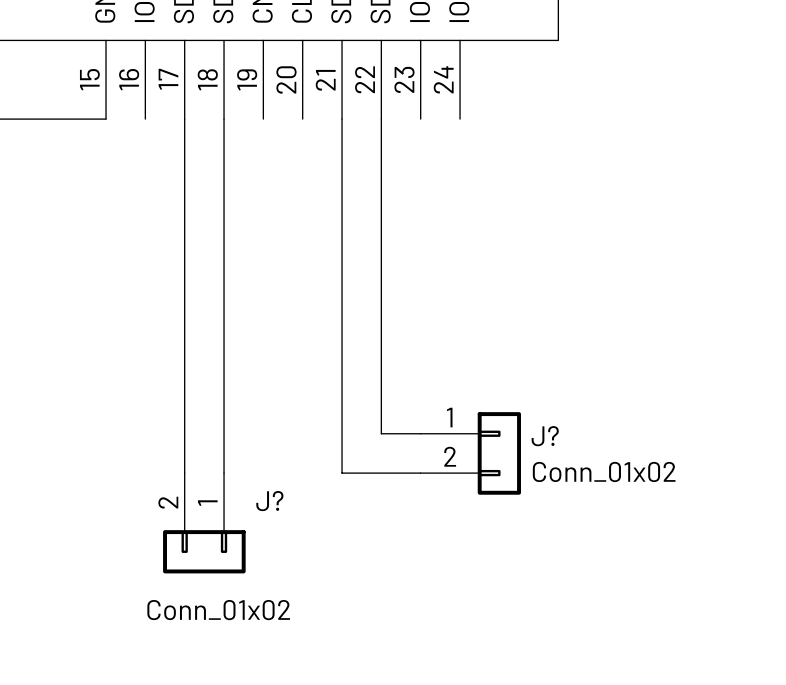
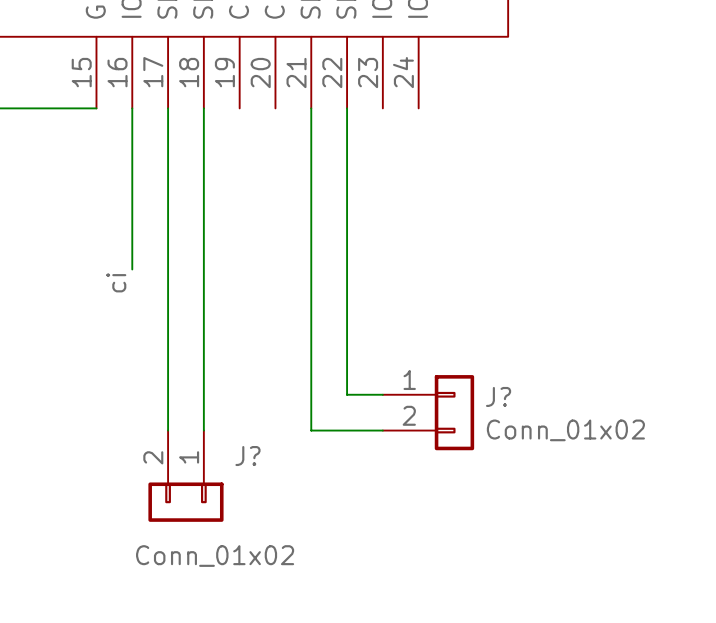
wire: none -> (132, 108) (132, 269)
label: none -> ci (116, 282)

